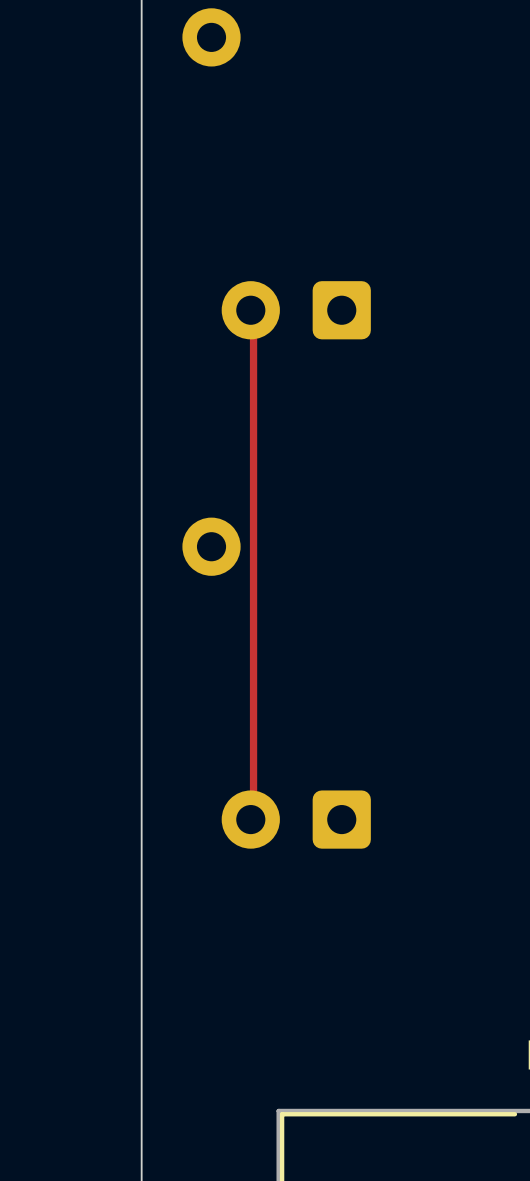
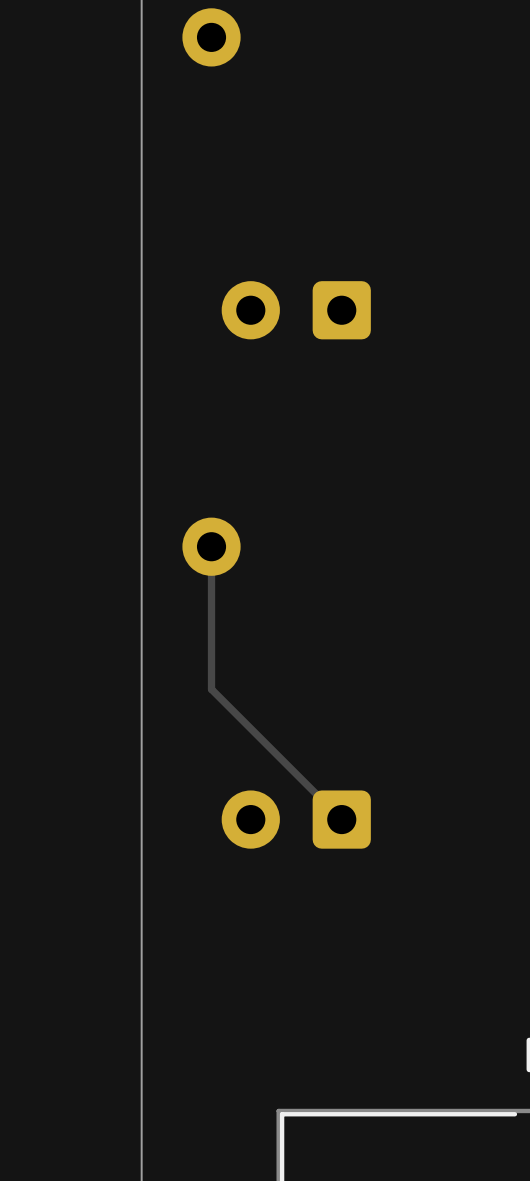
track: (250, 310) (253, 312) (253, 816) (250, 819) -> none
track: none -> (211, 546) (211, 689) (341, 819)

